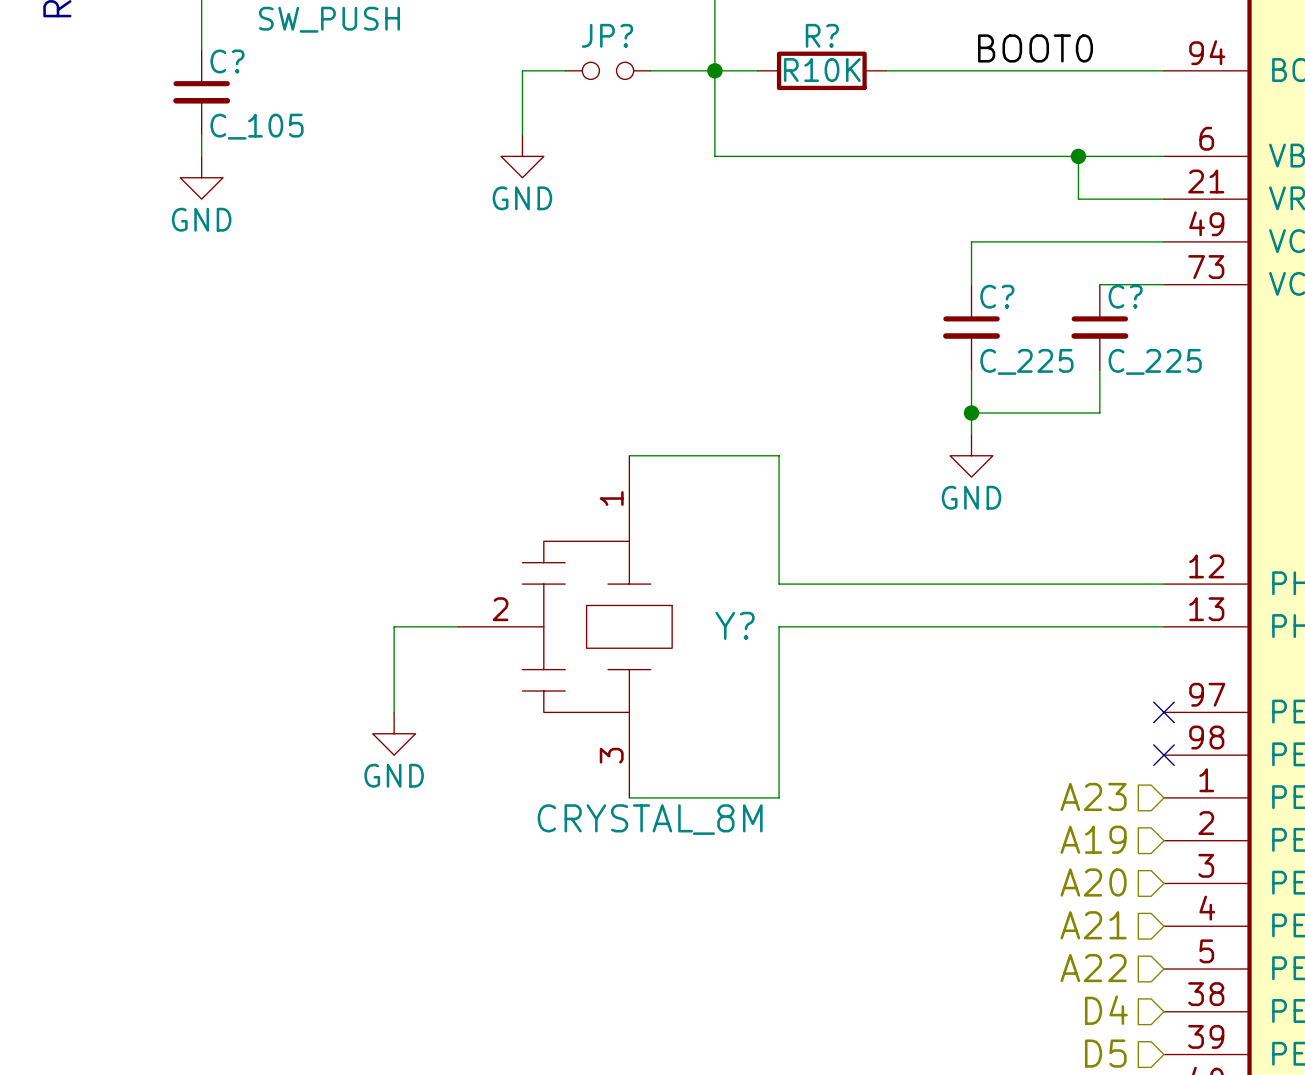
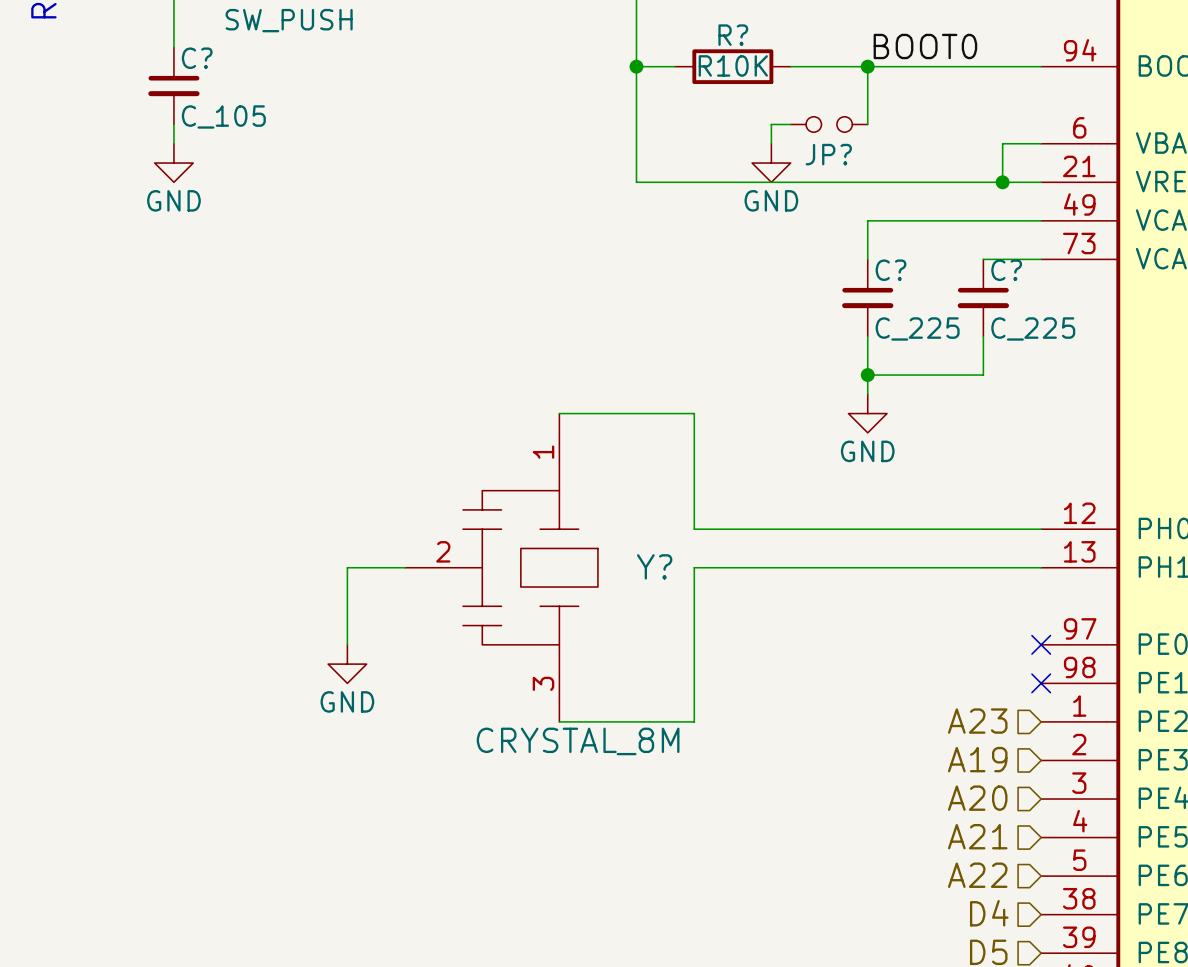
JP? name position: JP? (607, 35) -> JP? (828, 154)
wire: (565, 70) (522, 70) (522, 134) -> none
JP? position: (607, 70) -> (829, 124)
wire: (650, 70) (714, 70) -> none
wire: none -> (867, 66) (867, 124)
junction: none -> (867, 66)
wire: none -> (790, 124) (771, 124) (771, 143)
power symbol position: GND (522, 156) -> GND (771, 163)
wire: (714, 156) (1121, 156) -> (636, 143) (636, 182) (964, 182)
wire: (1078, 156) (1078, 199) -> (1002, 143) (1002, 182)
junction position: (1078, 156) -> (1002, 182)

